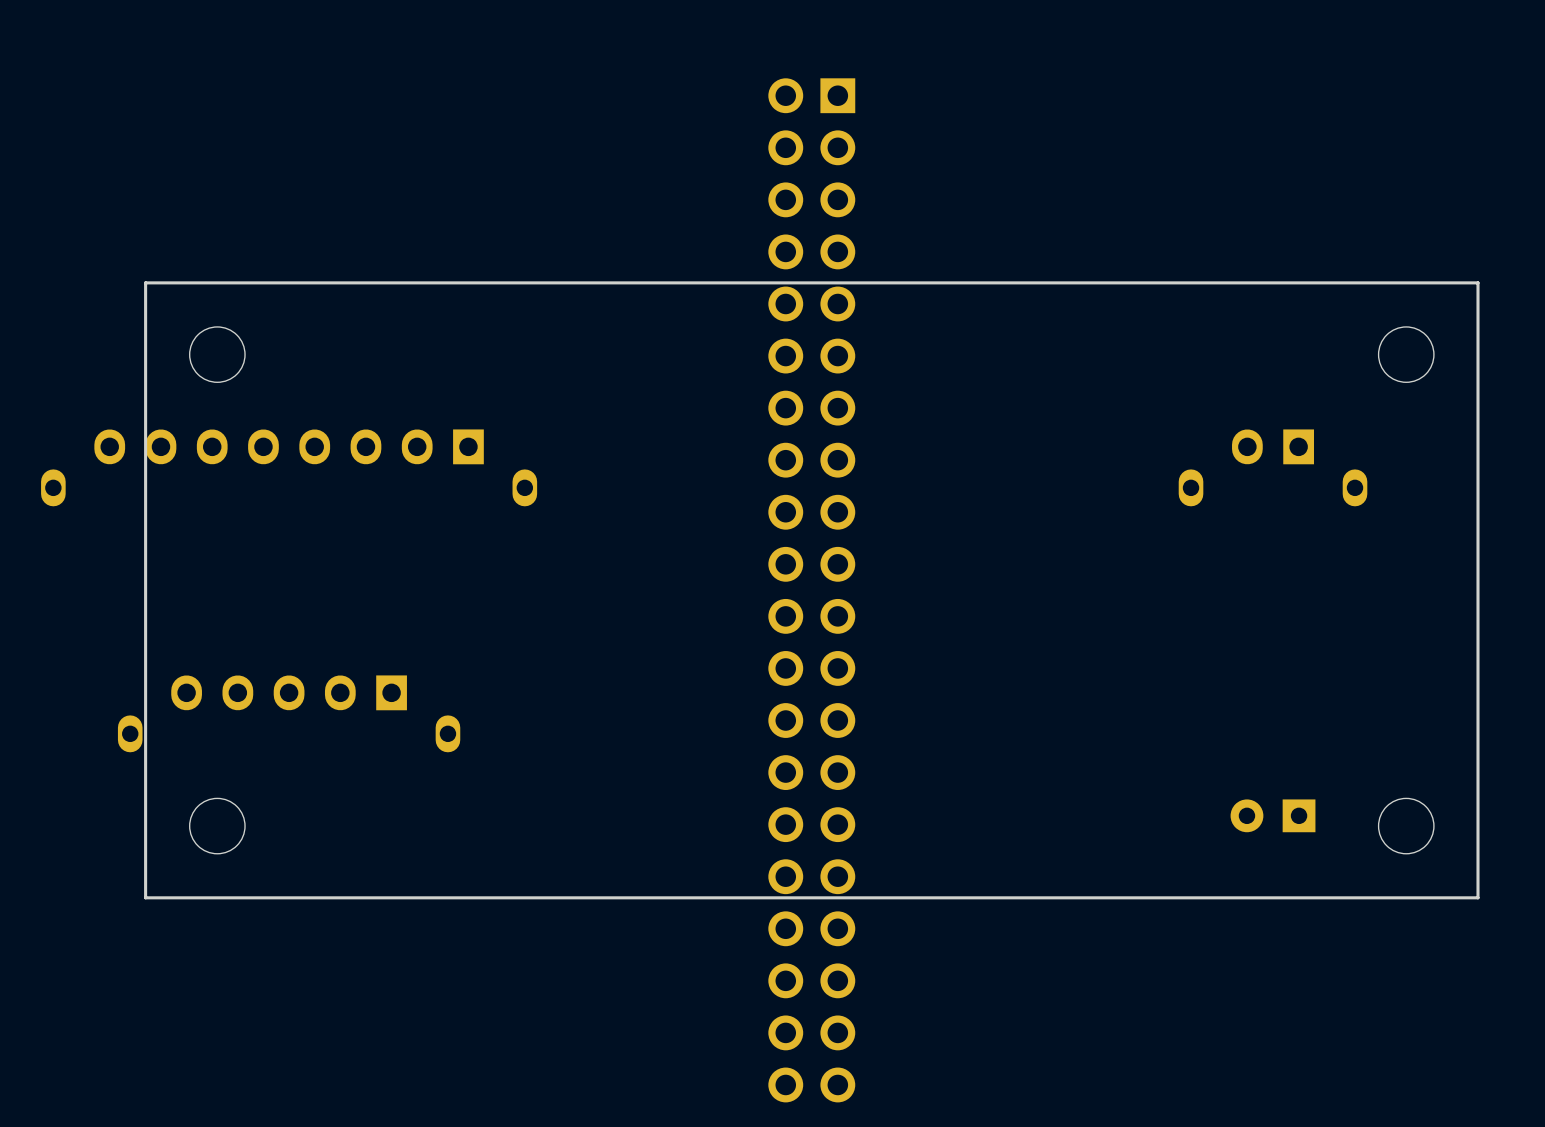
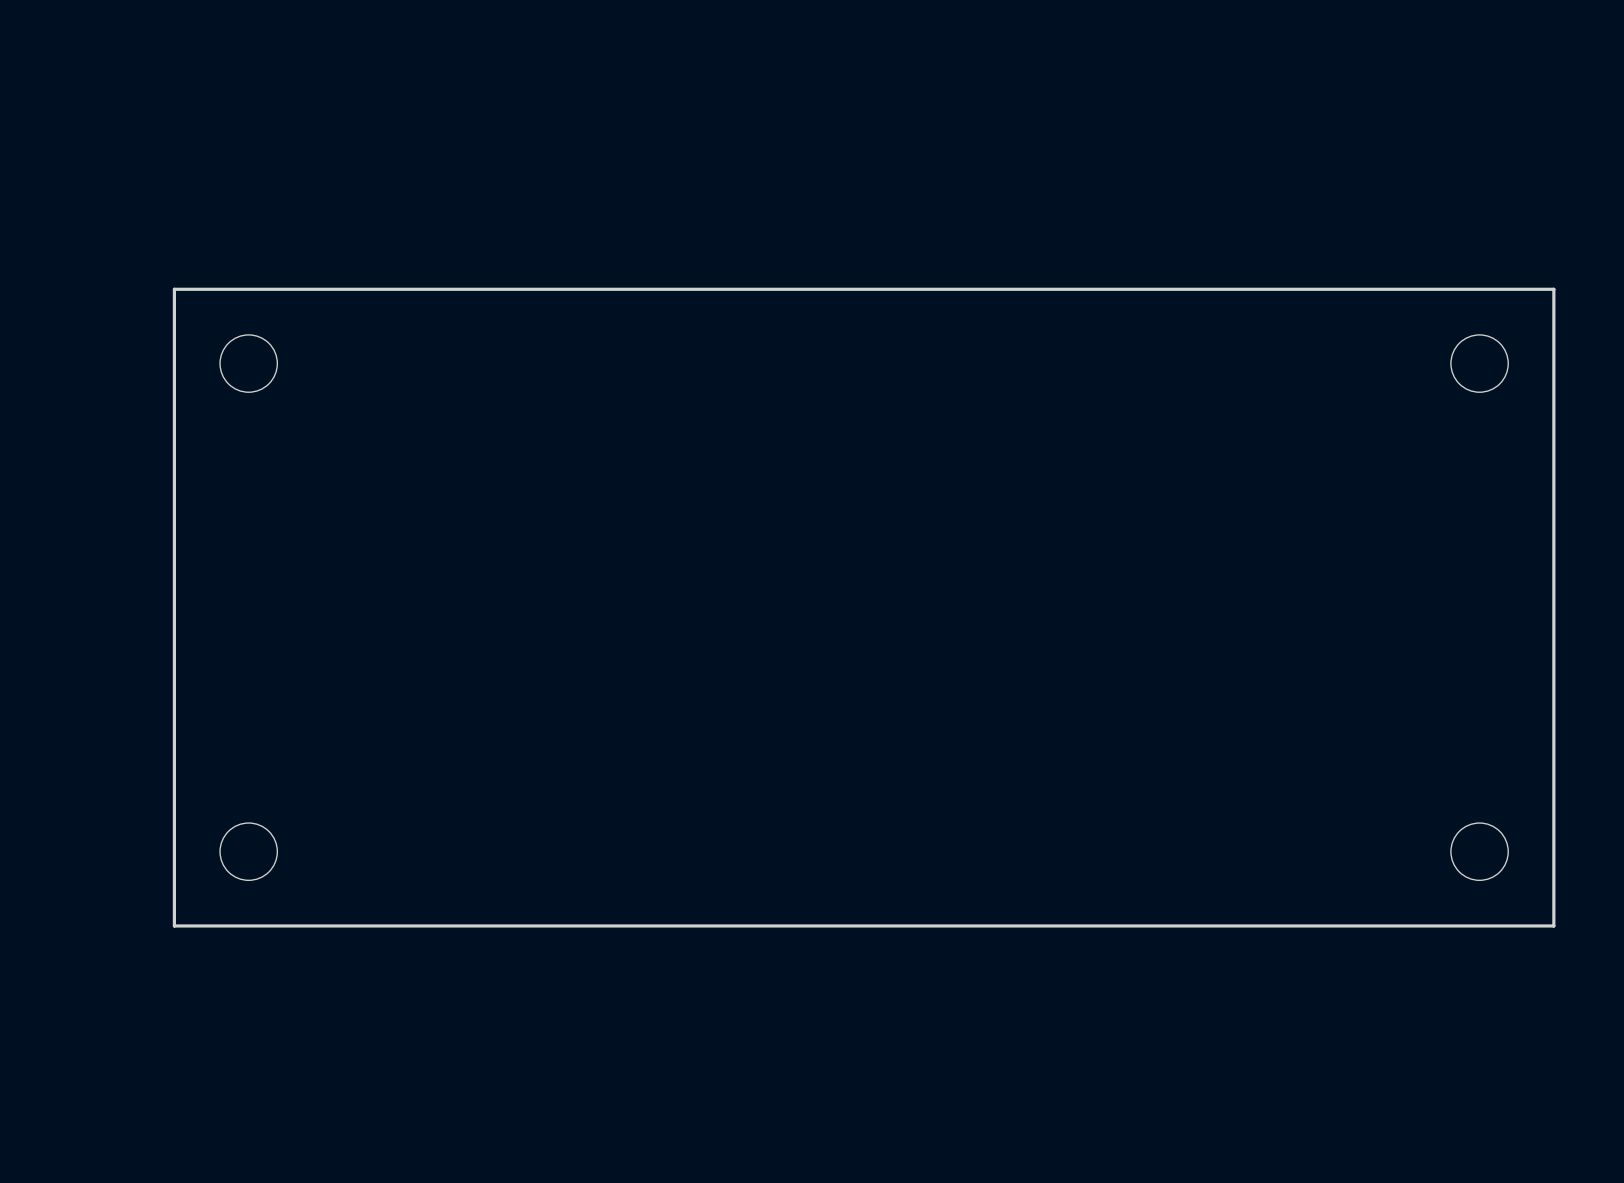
part: (289, 467) -> none
part: (1273, 467) -> none
part: (811, 590) -> none
part: (289, 713) -> none
part: (1273, 815) -> none

